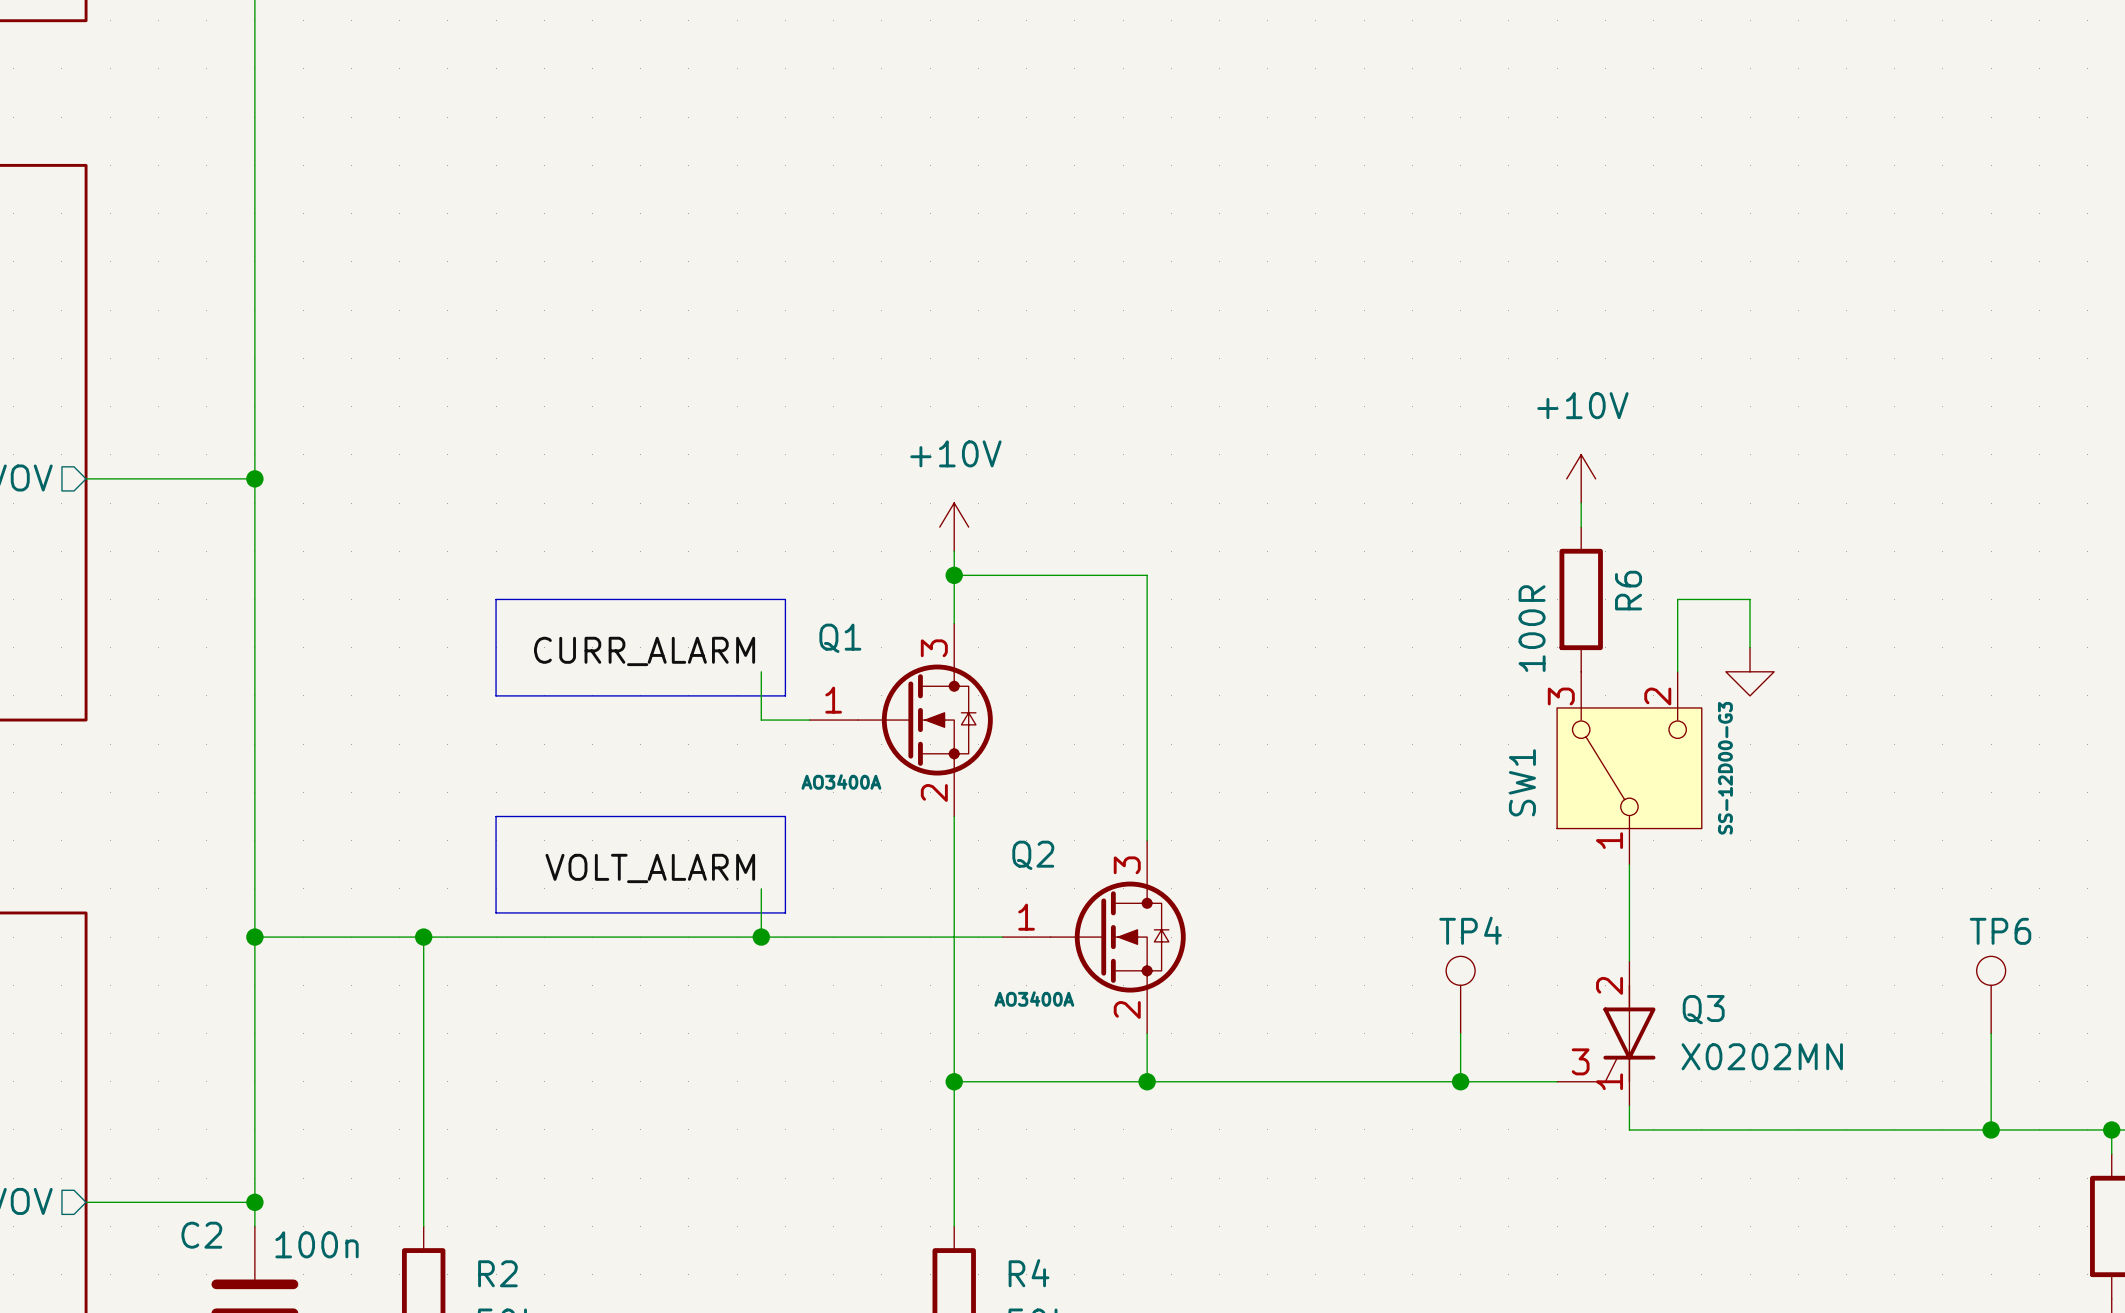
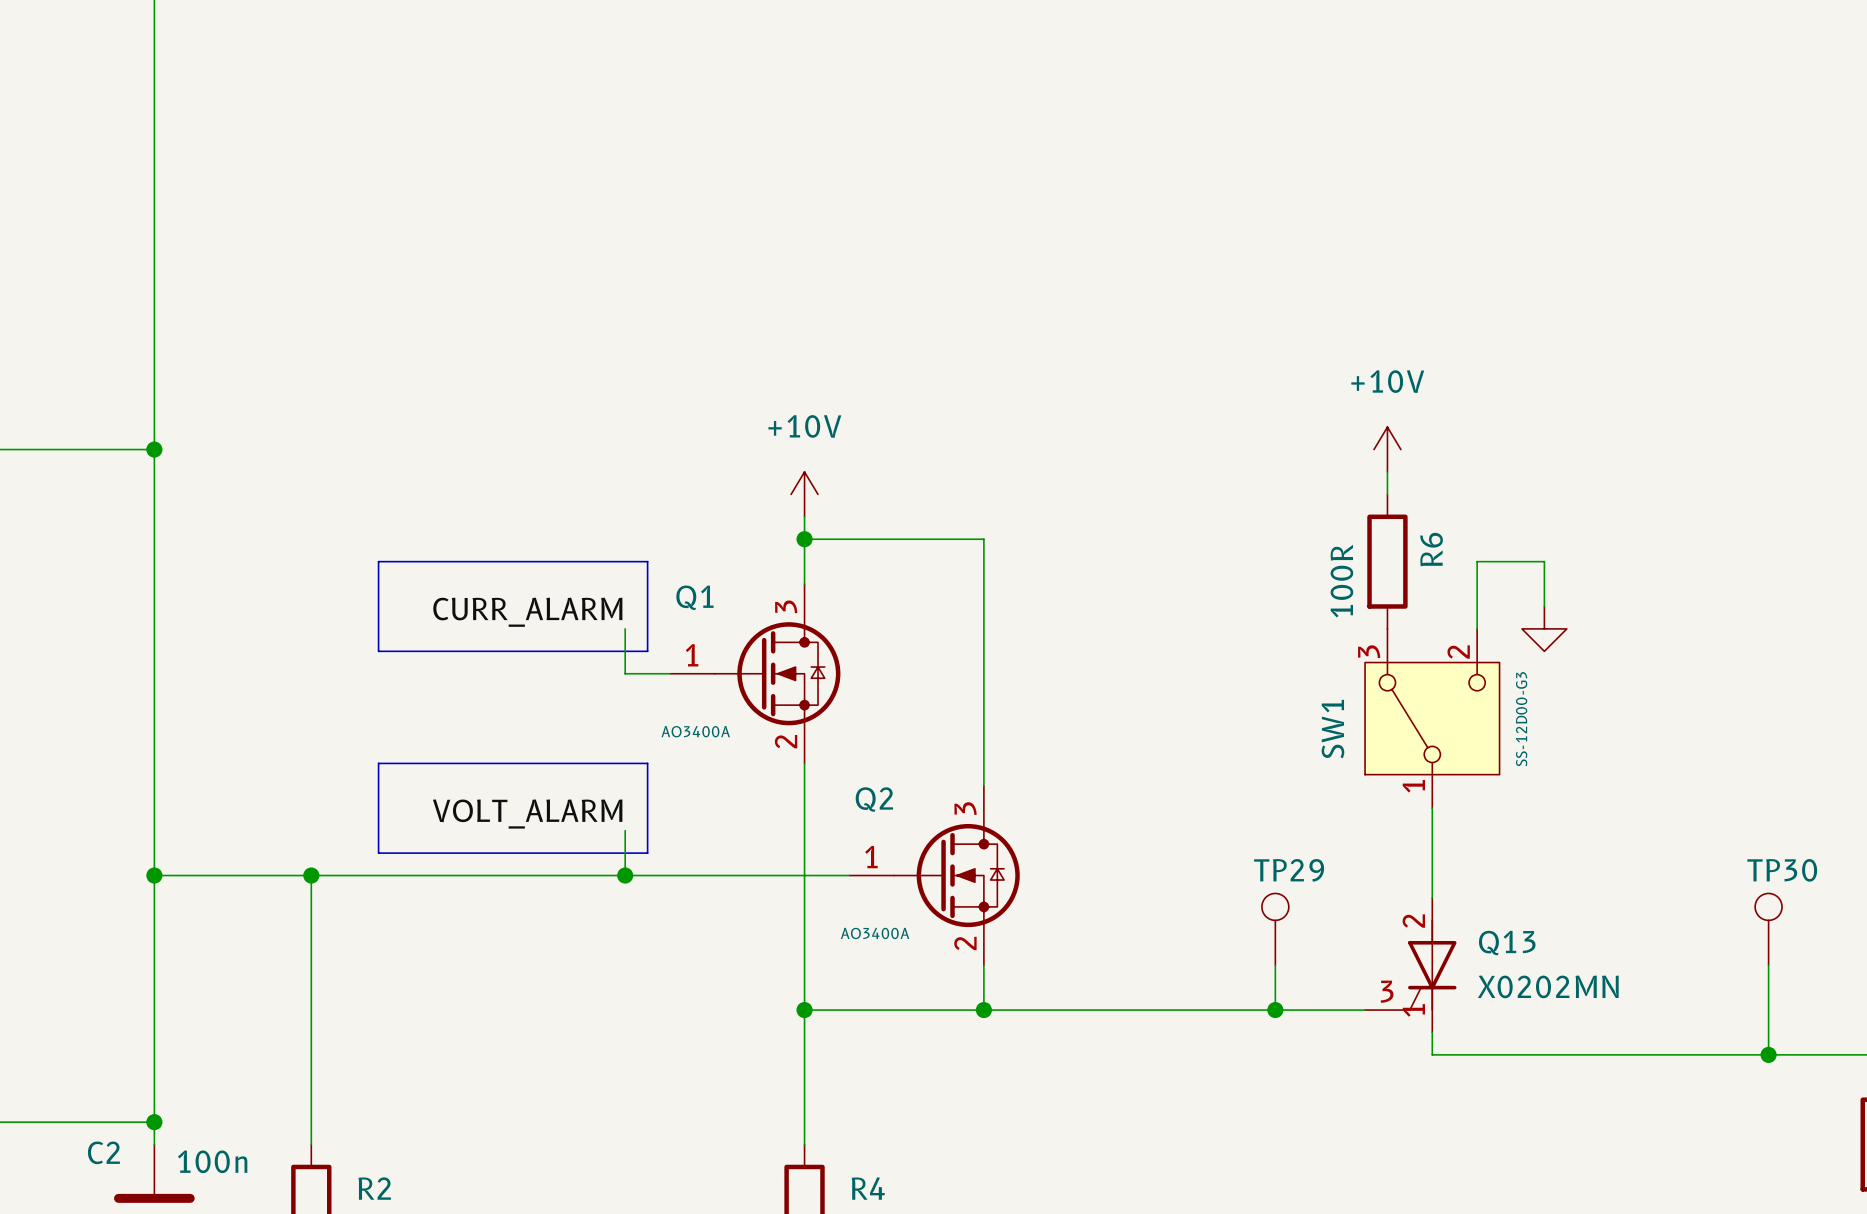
TP4 name: TP4 (1470, 930) -> TP29 (1289, 870)
TP6 name: TP6 (2000, 931) -> TP30 (1782, 870)
Q3 name: Q3 (1703, 1009) -> Q13 (1507, 943)

